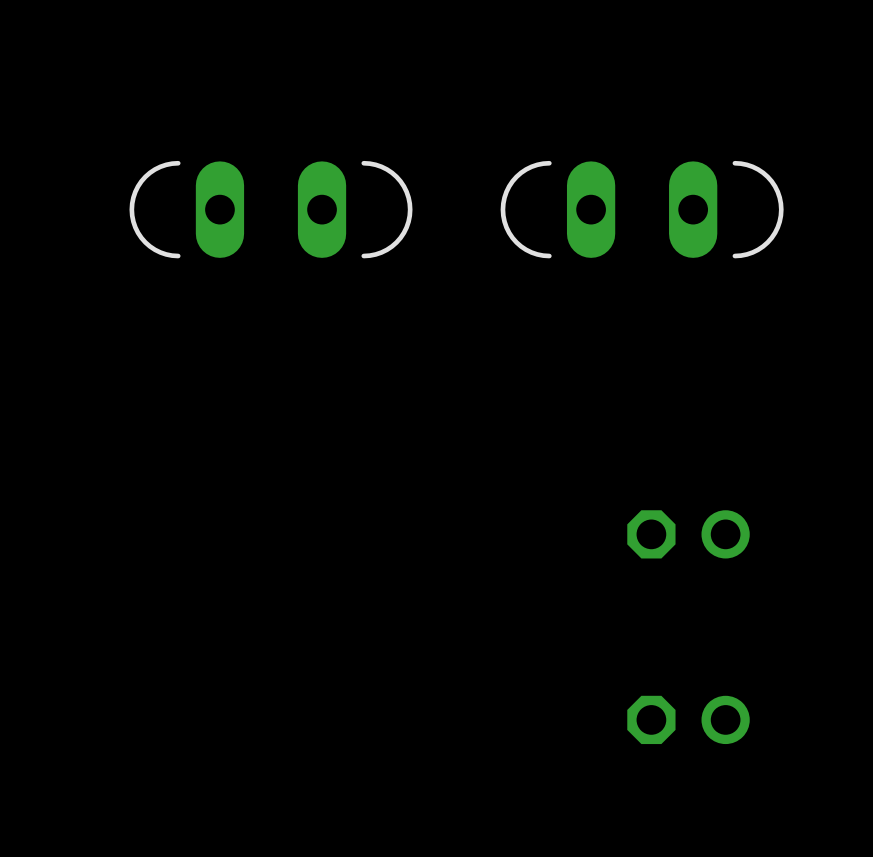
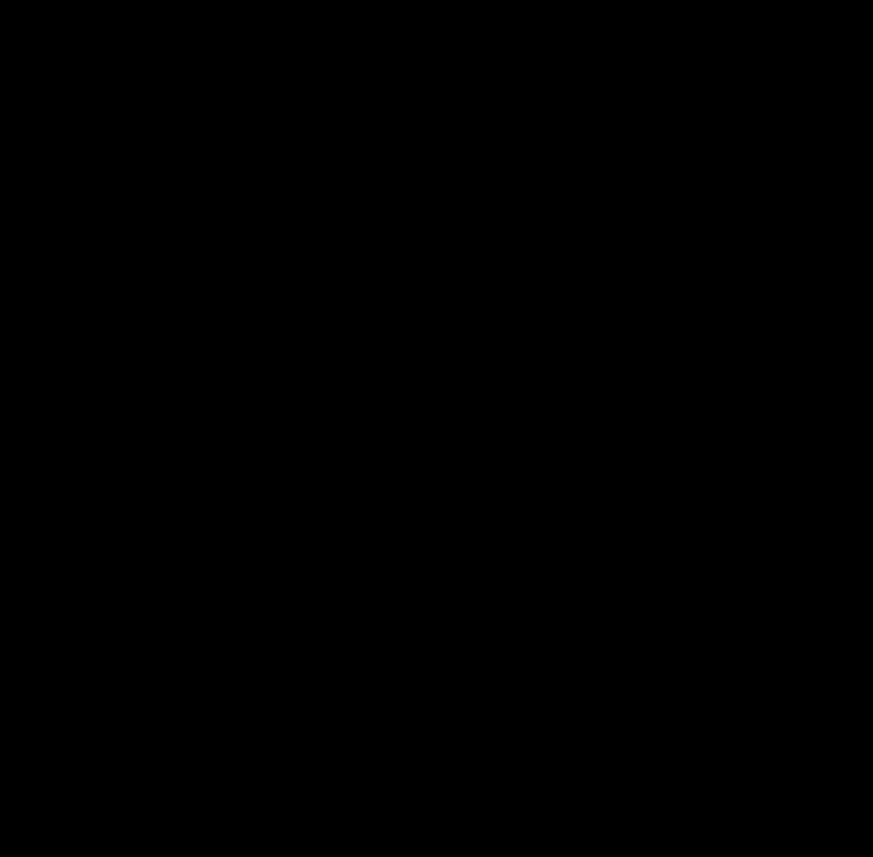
part: (271, 209) -> none
part: (642, 209) -> none
part: (688, 534) -> none
part: (688, 719) -> none

